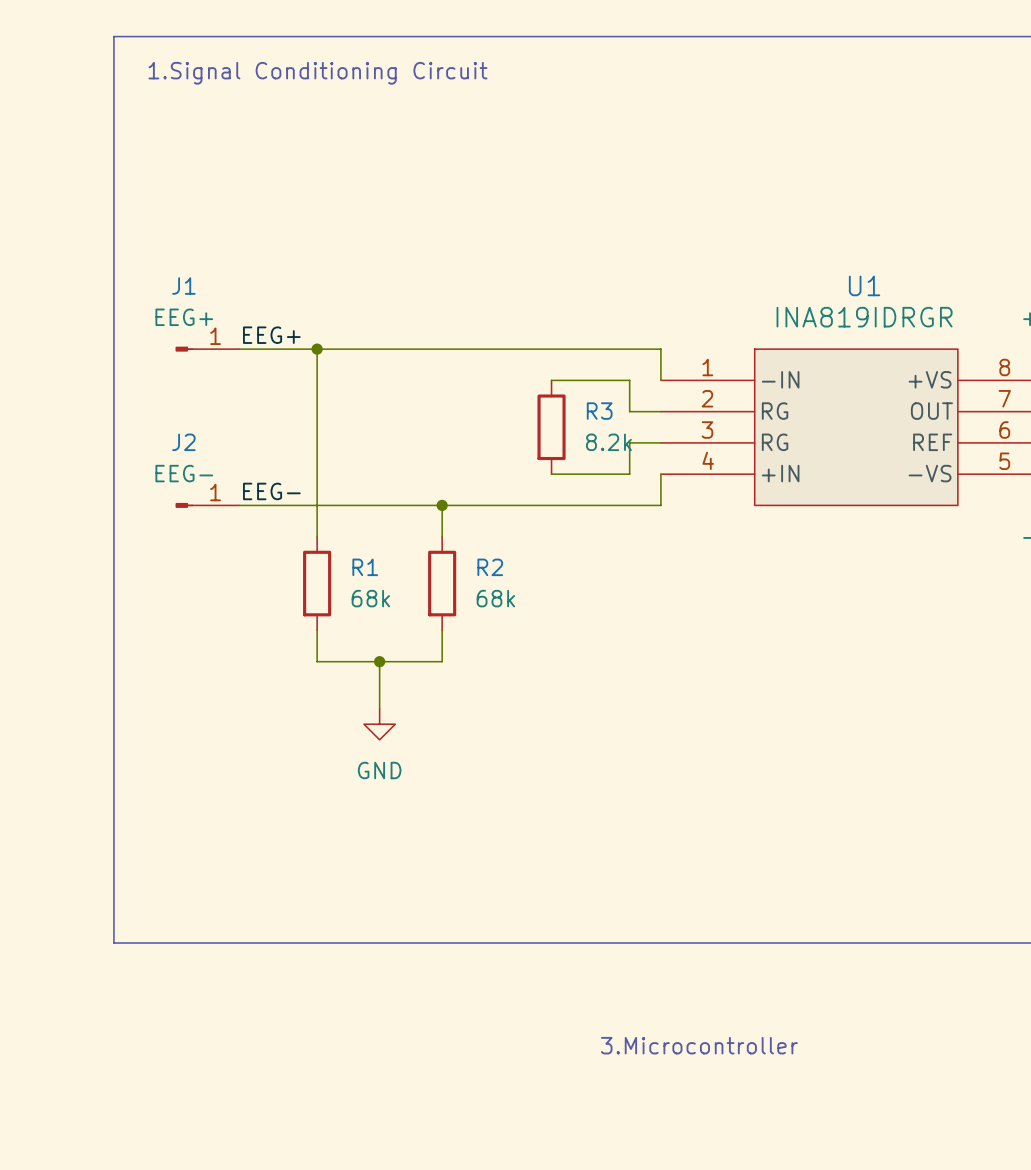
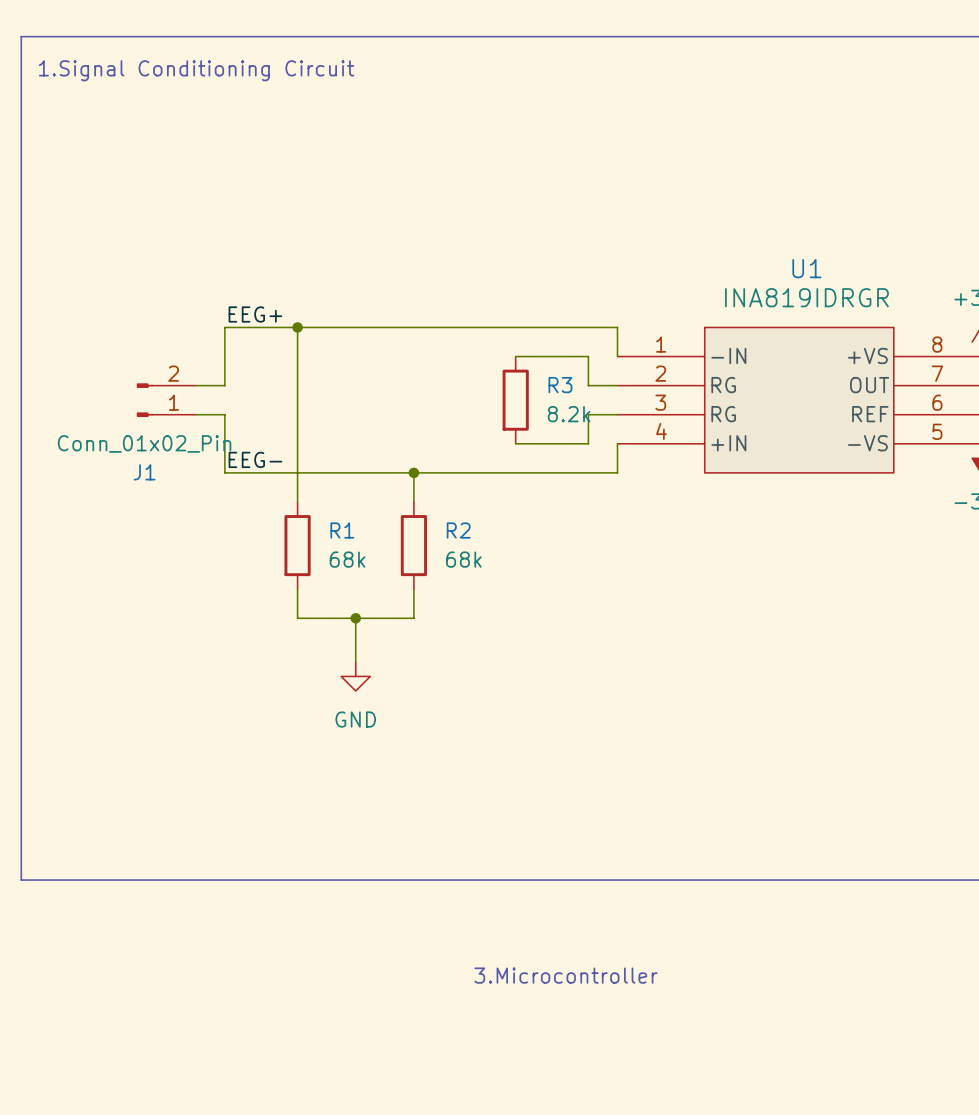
line: (113, 36) (113, 943) -> (108, 36) (21, 36) (21, 880) (108, 880)
text position: 1.Signal Conditioning Circuit (317, 73) -> 1.Signal Conditioning Circuit (196, 70)
J1 name position: J1 (183, 286) -> J1 (144, 472)
J1 value: EEG+ (184, 317) -> Conn_01x02_Pin (144, 443)
J1 symbol: [175, 346, 239, 352] -> [136, 383, 196, 418]
wire: none -> (224, 327) (224, 385) (195, 385)
wire: none -> (195, 414) (224, 414) (224, 472)
J2: EEG- (207, 505) -> none
text position: 3.Microcontroller (699, 1045) -> 3.Microcontroller (566, 975)

